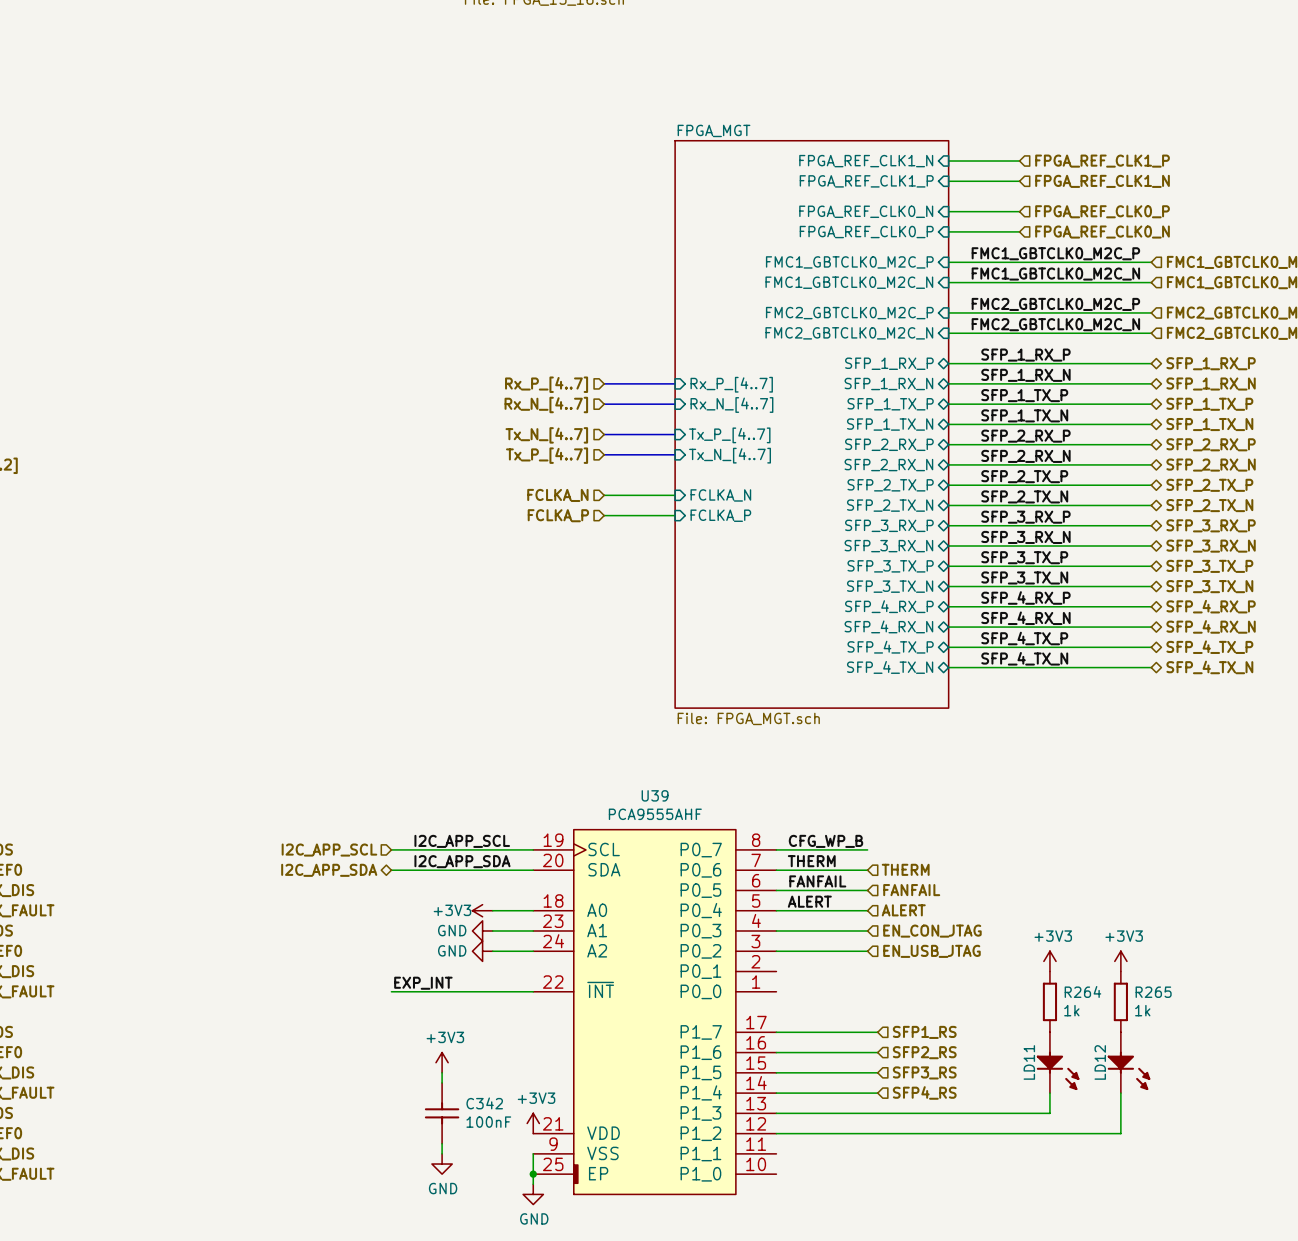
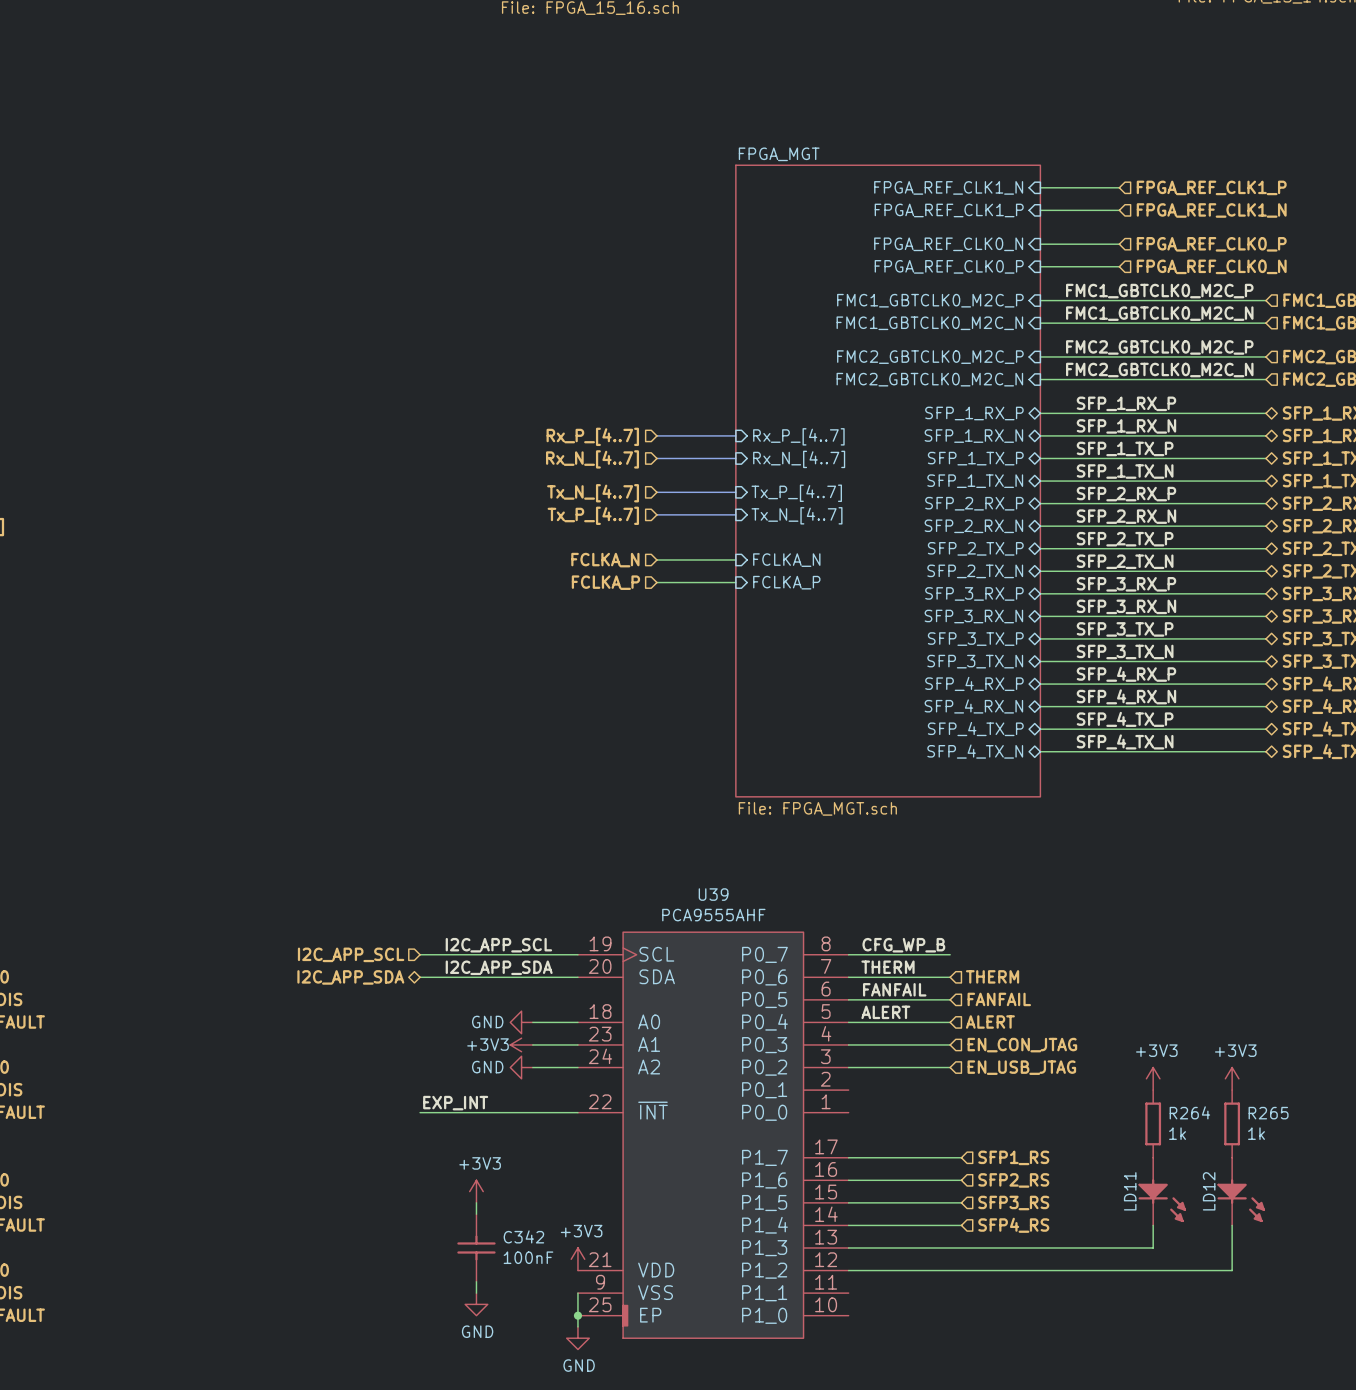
power symbol: +3V3 (482, 910) -> GND (521, 1022)
power symbol: GND (482, 930) -> +3V3 (521, 1044)

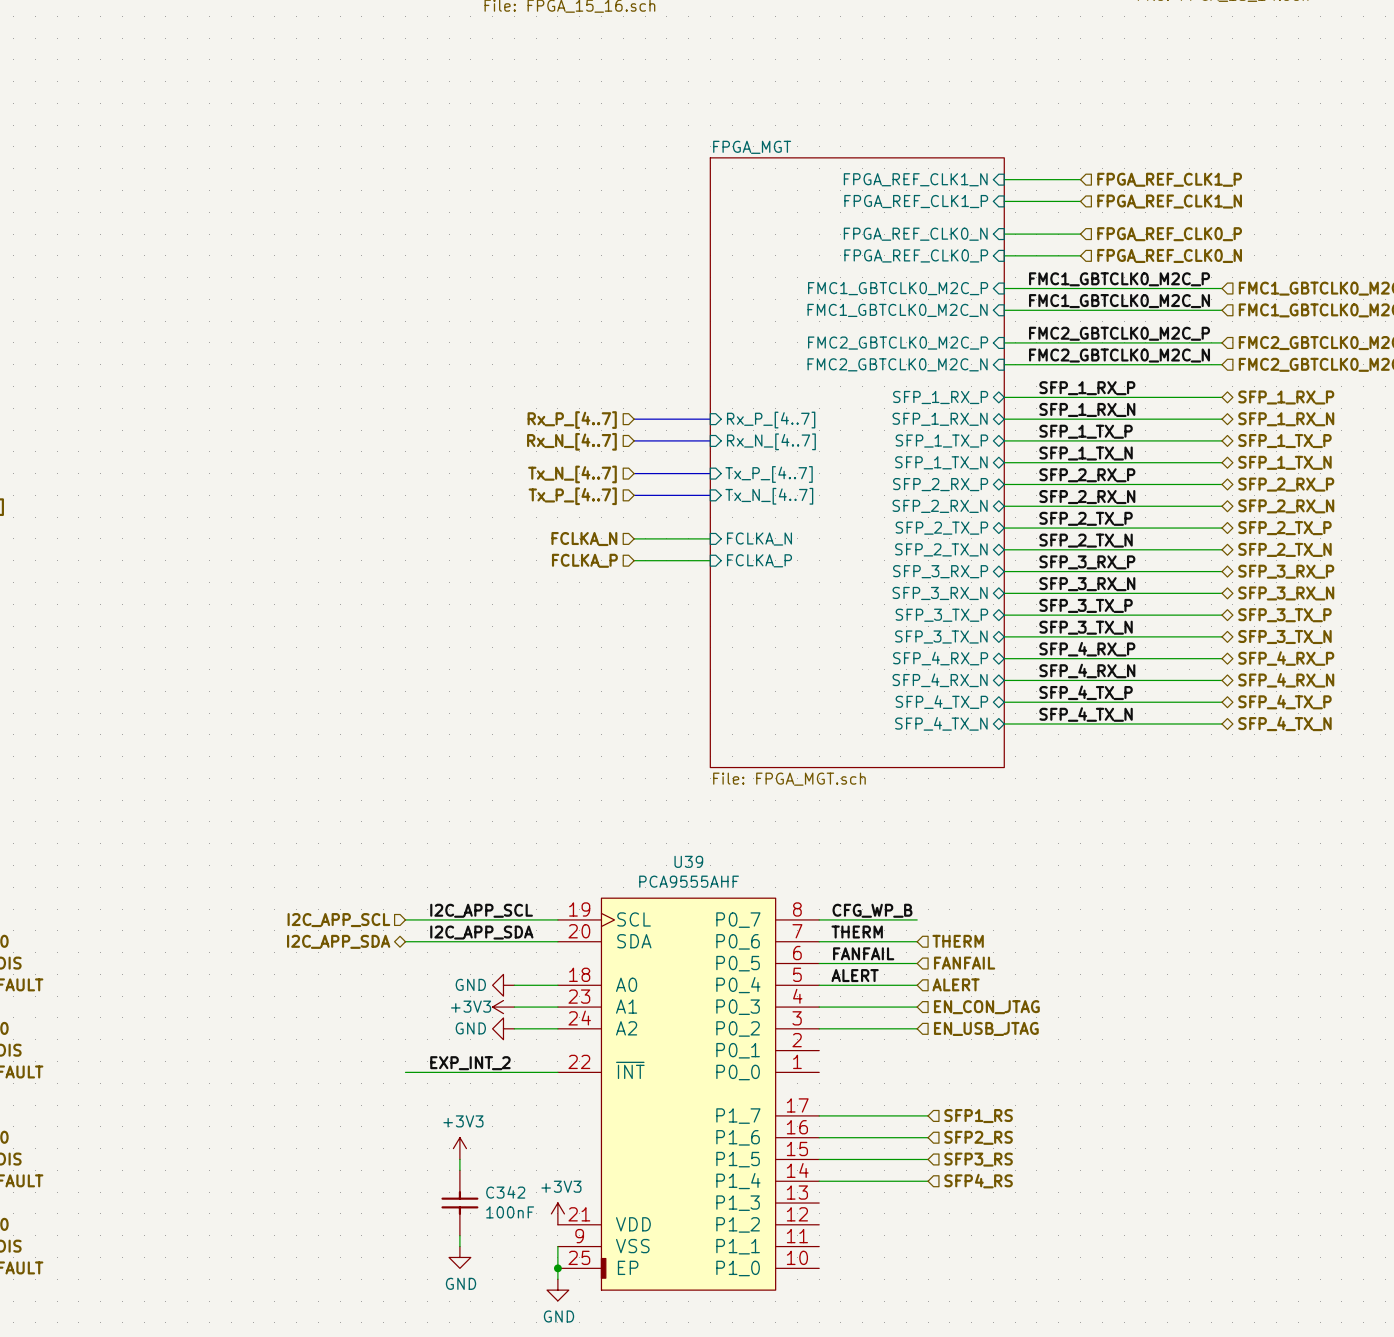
power symbol: +3V3 (1153, 1078) -> none
power symbol: +3V3 (1232, 1078) -> none
label: EXP_INT (455, 1103) -> EXP_INT_2 (470, 1063)
R264: (1153, 1123) -> none
R265: (1232, 1123) -> none
LD11: (1162, 1191) -> none
LD12: (1241, 1191) -> none
wire: (1153, 1225) (1153, 1247) (848, 1247) -> none
wire: (1232, 1225) (1232, 1270) (848, 1270) -> none

